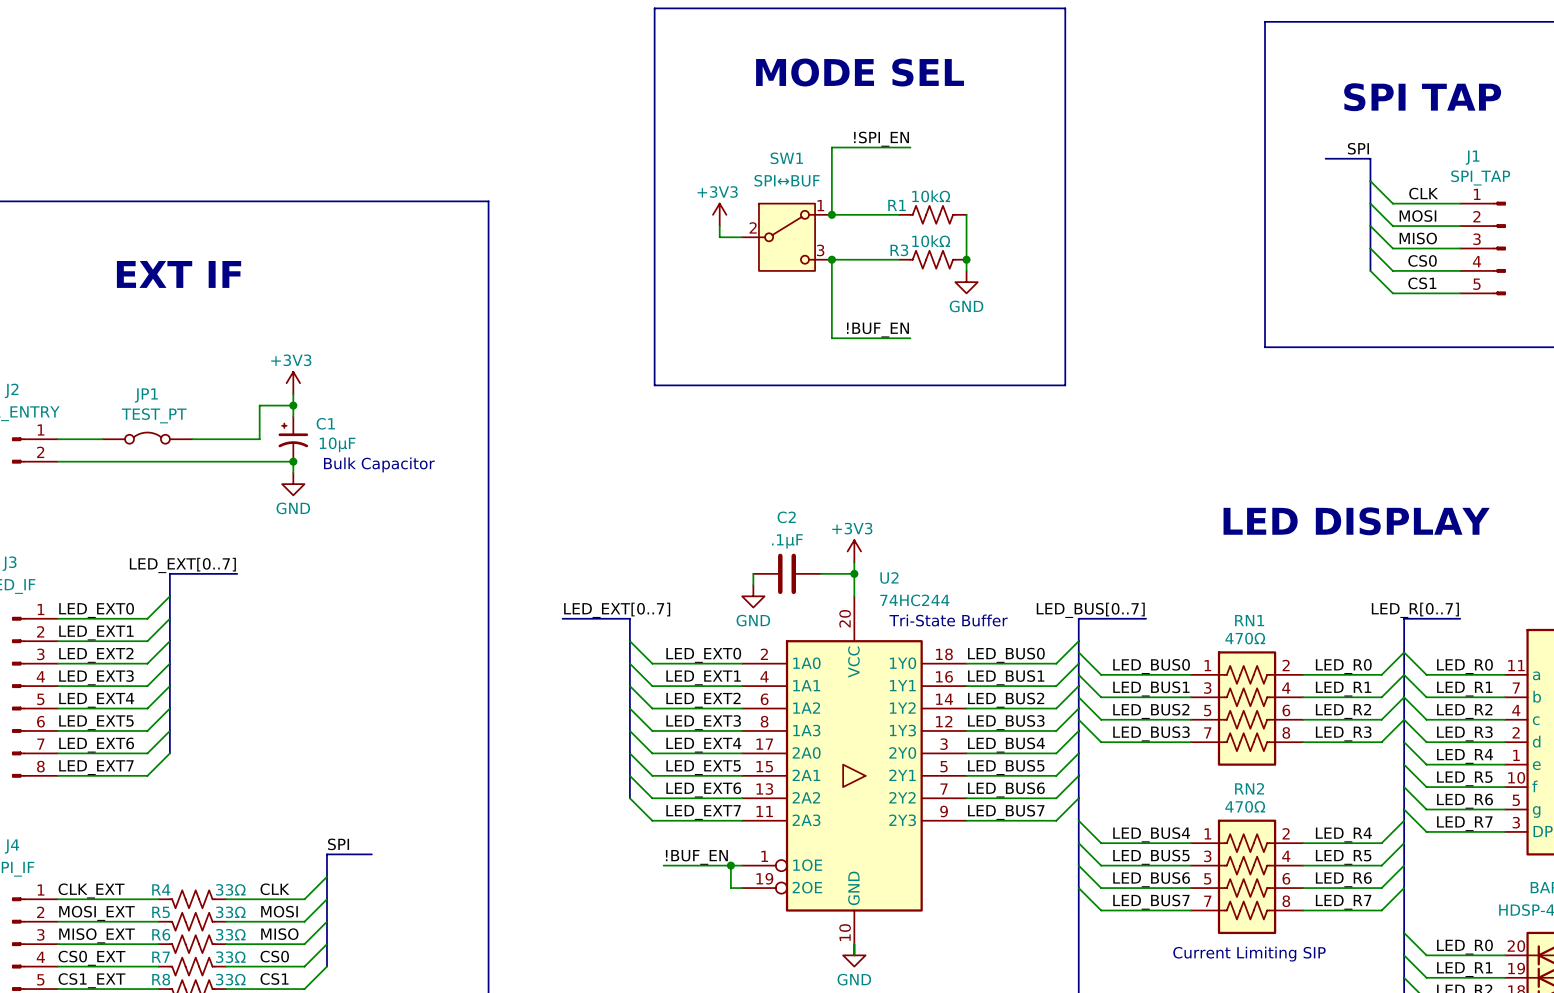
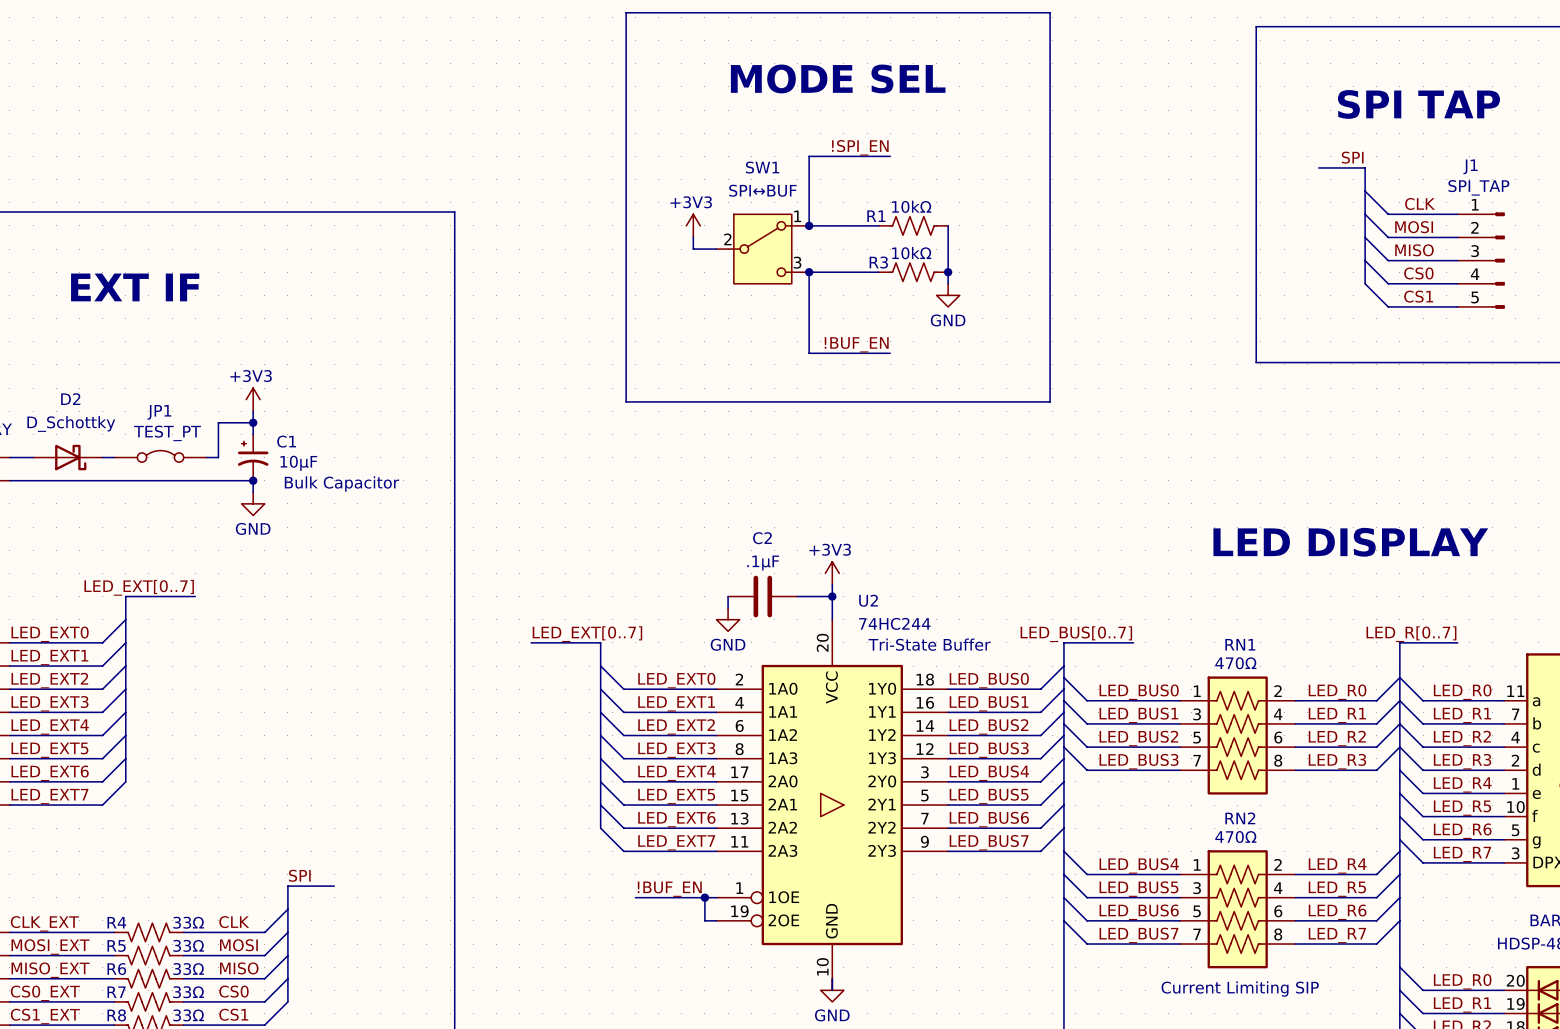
JP1 position: (147, 438) -> (160, 456)
D2: none -> D_Schottky (67, 457)
wire: none -> (102, 457) (114, 457)
wire: (192, 439) (248, 439) -> none

